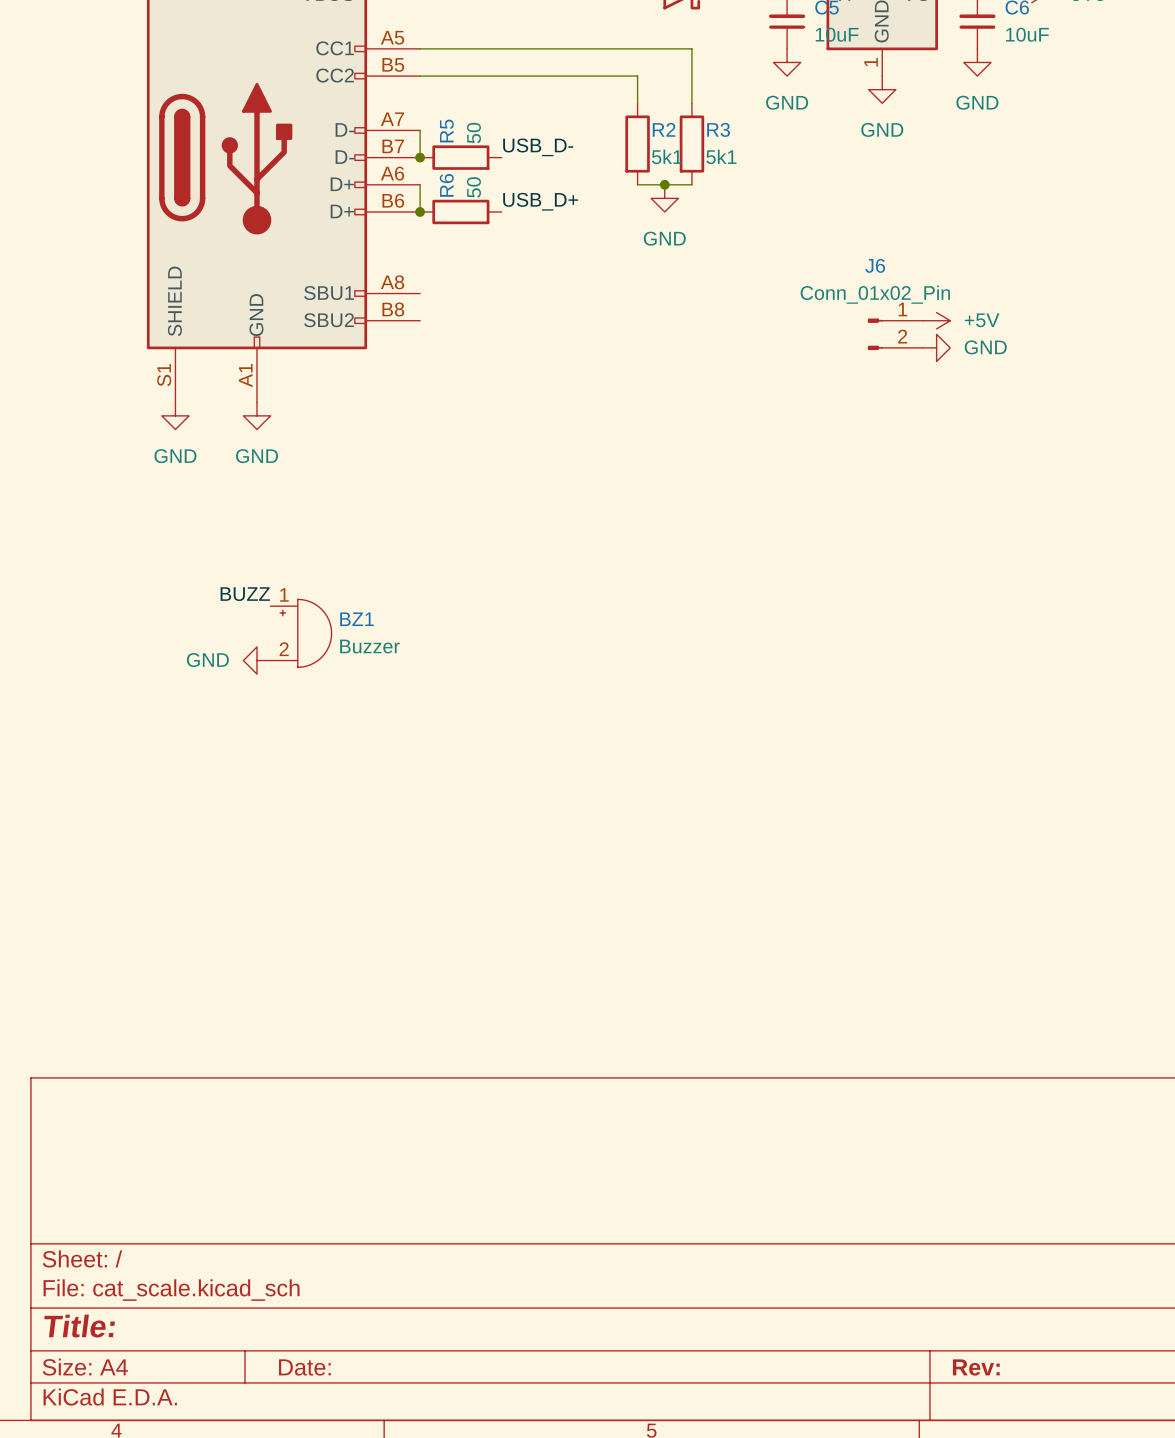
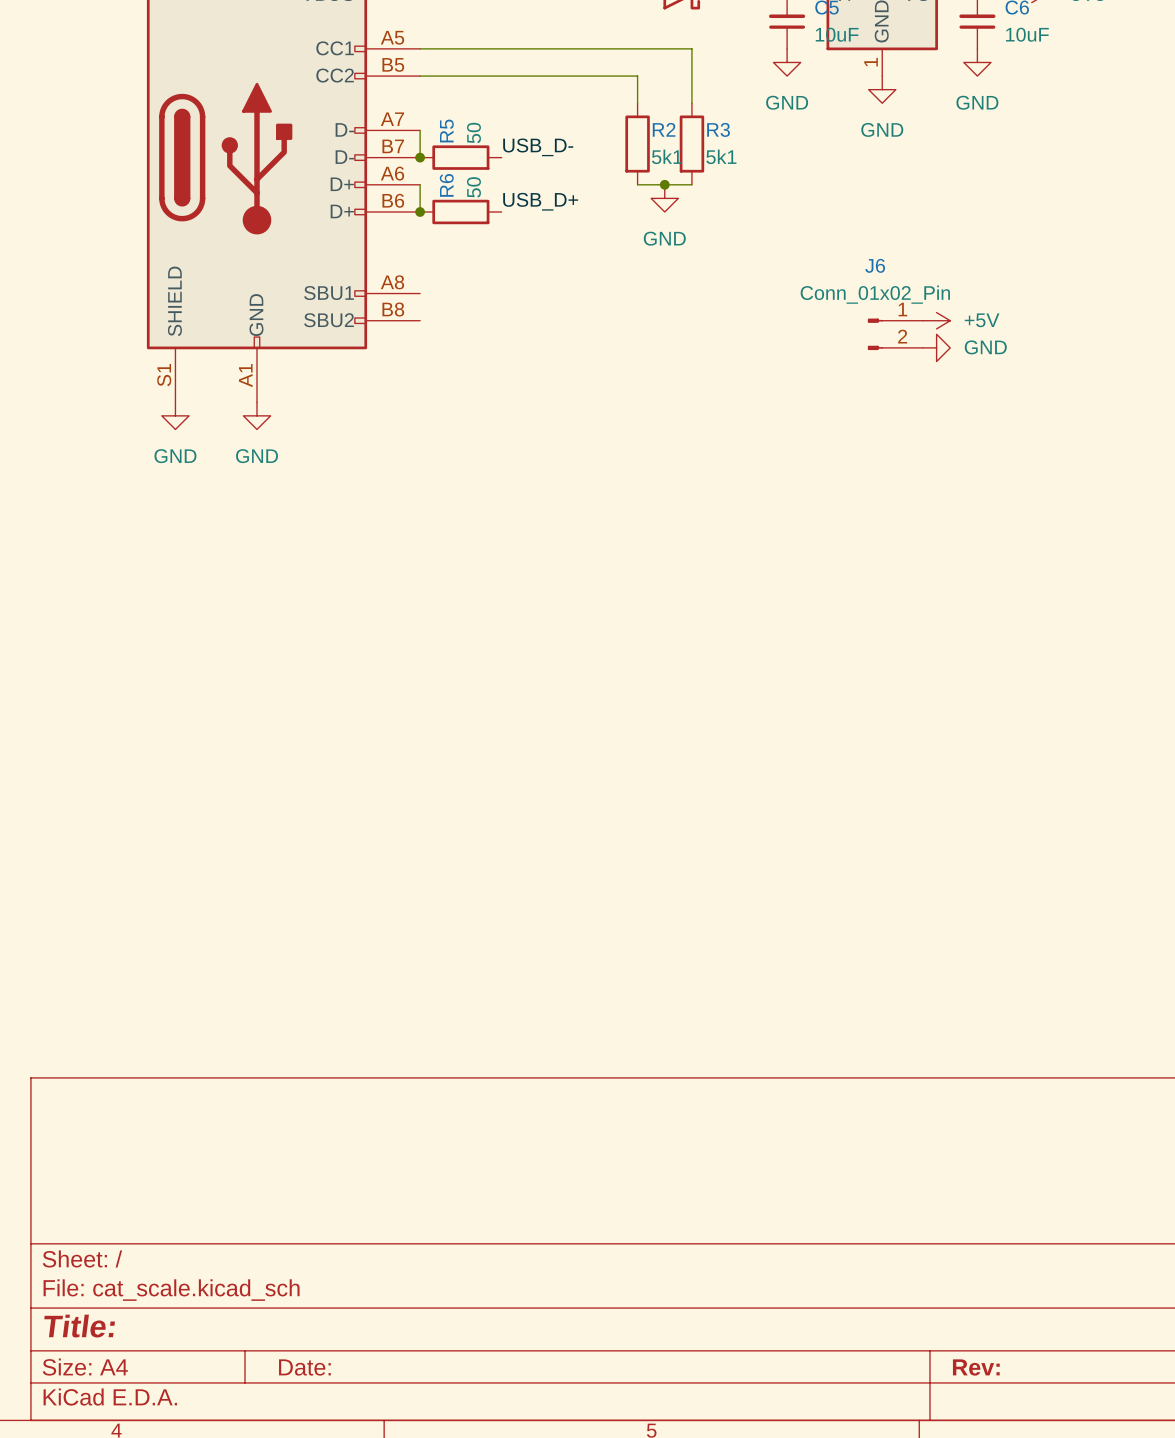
label: BUZZ (245, 594) -> none
BZ1: Buzzer (301, 633) -> none
power symbol: GND (256, 660) -> none

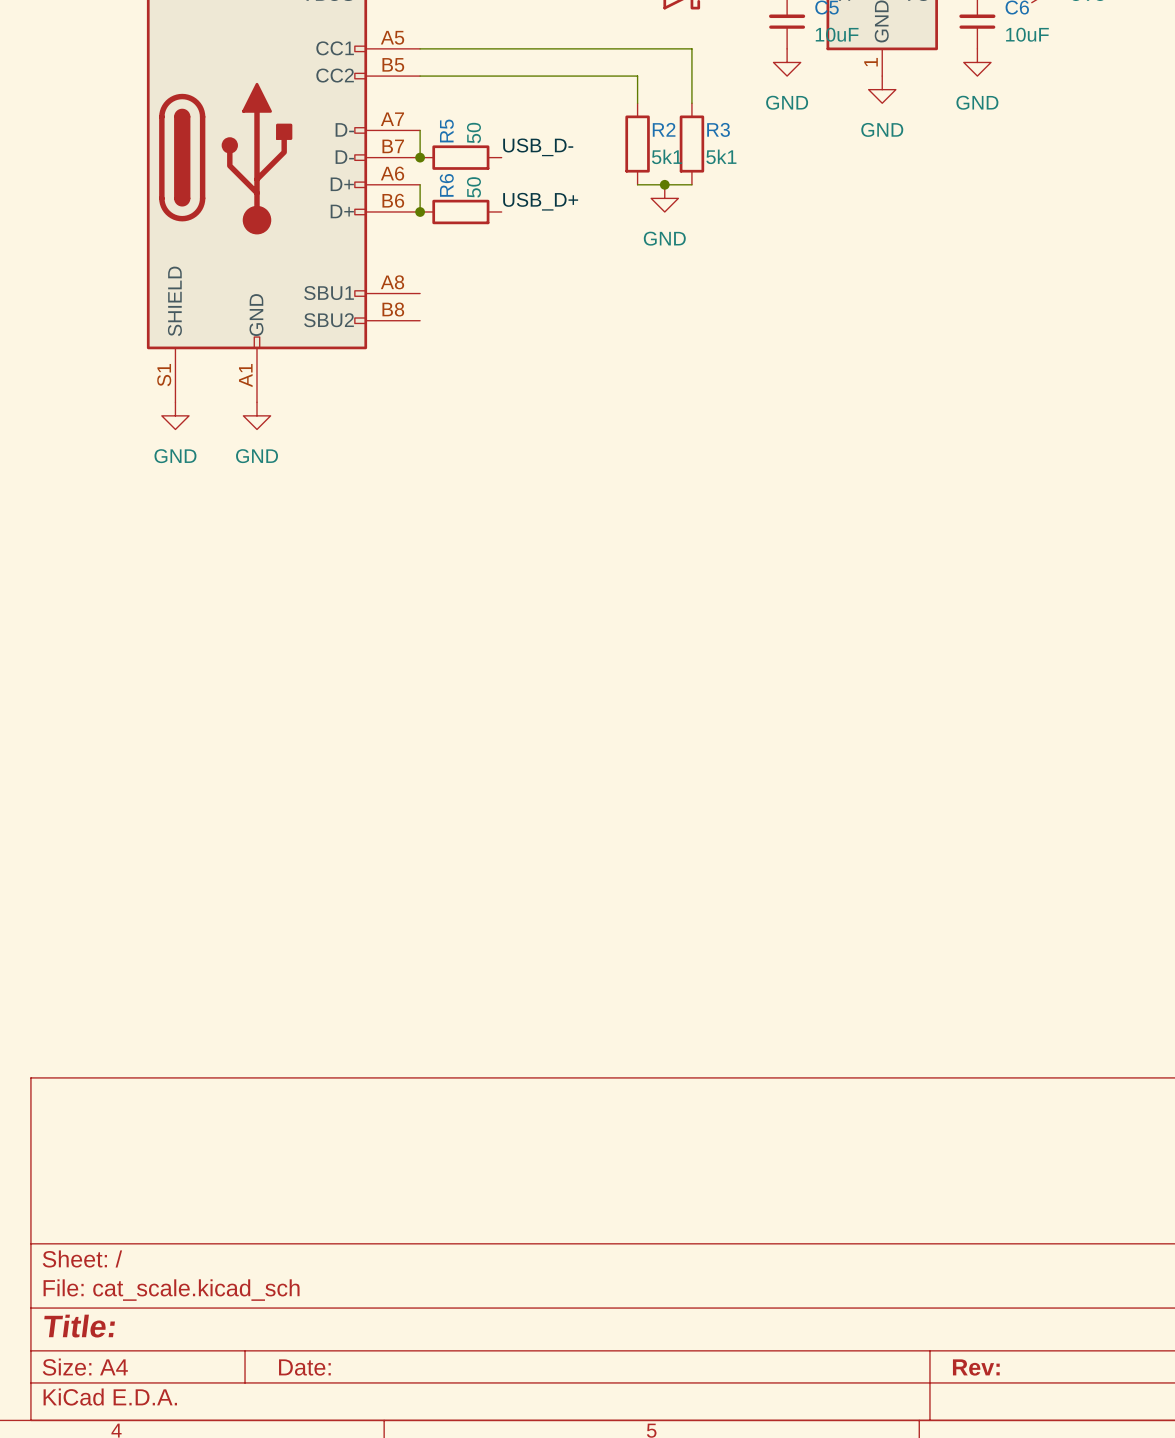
power symbol: +5V (936, 320) -> none
J6: Conn_01x02_Pin (895, 334) -> none
power symbol: GND (936, 347) -> none

